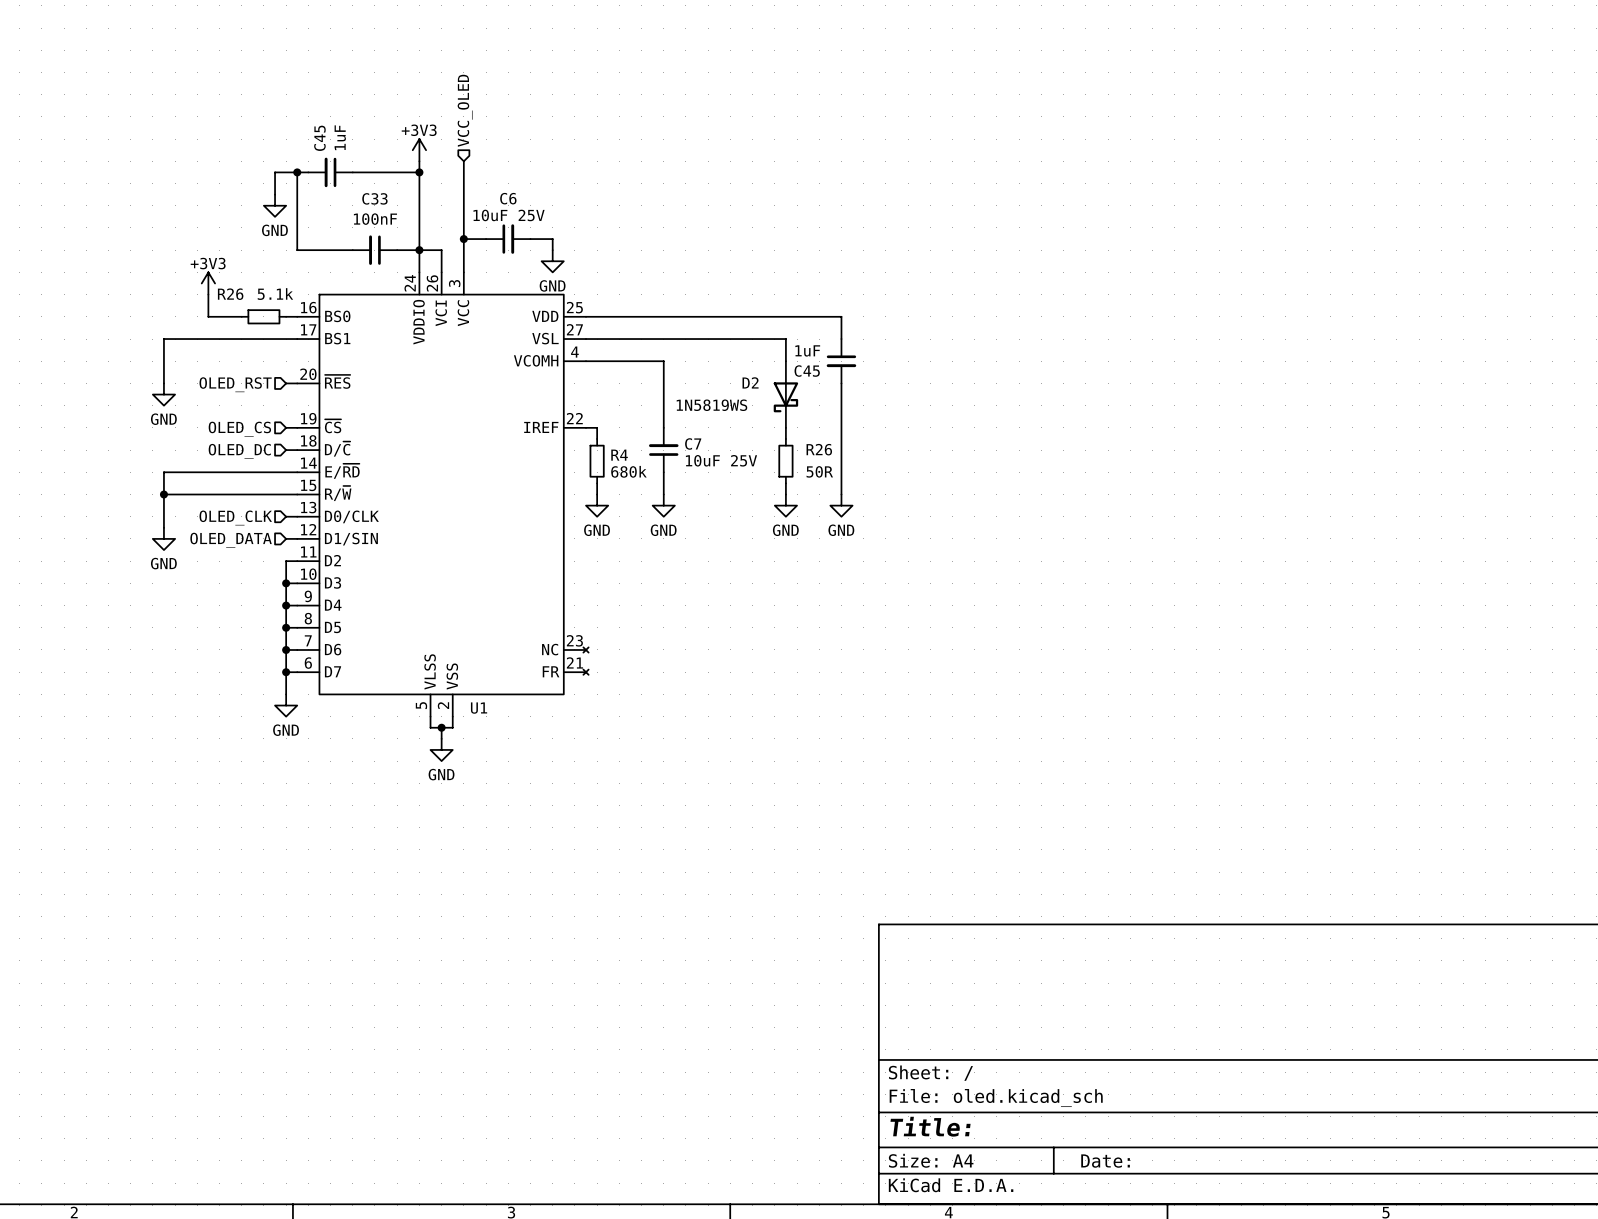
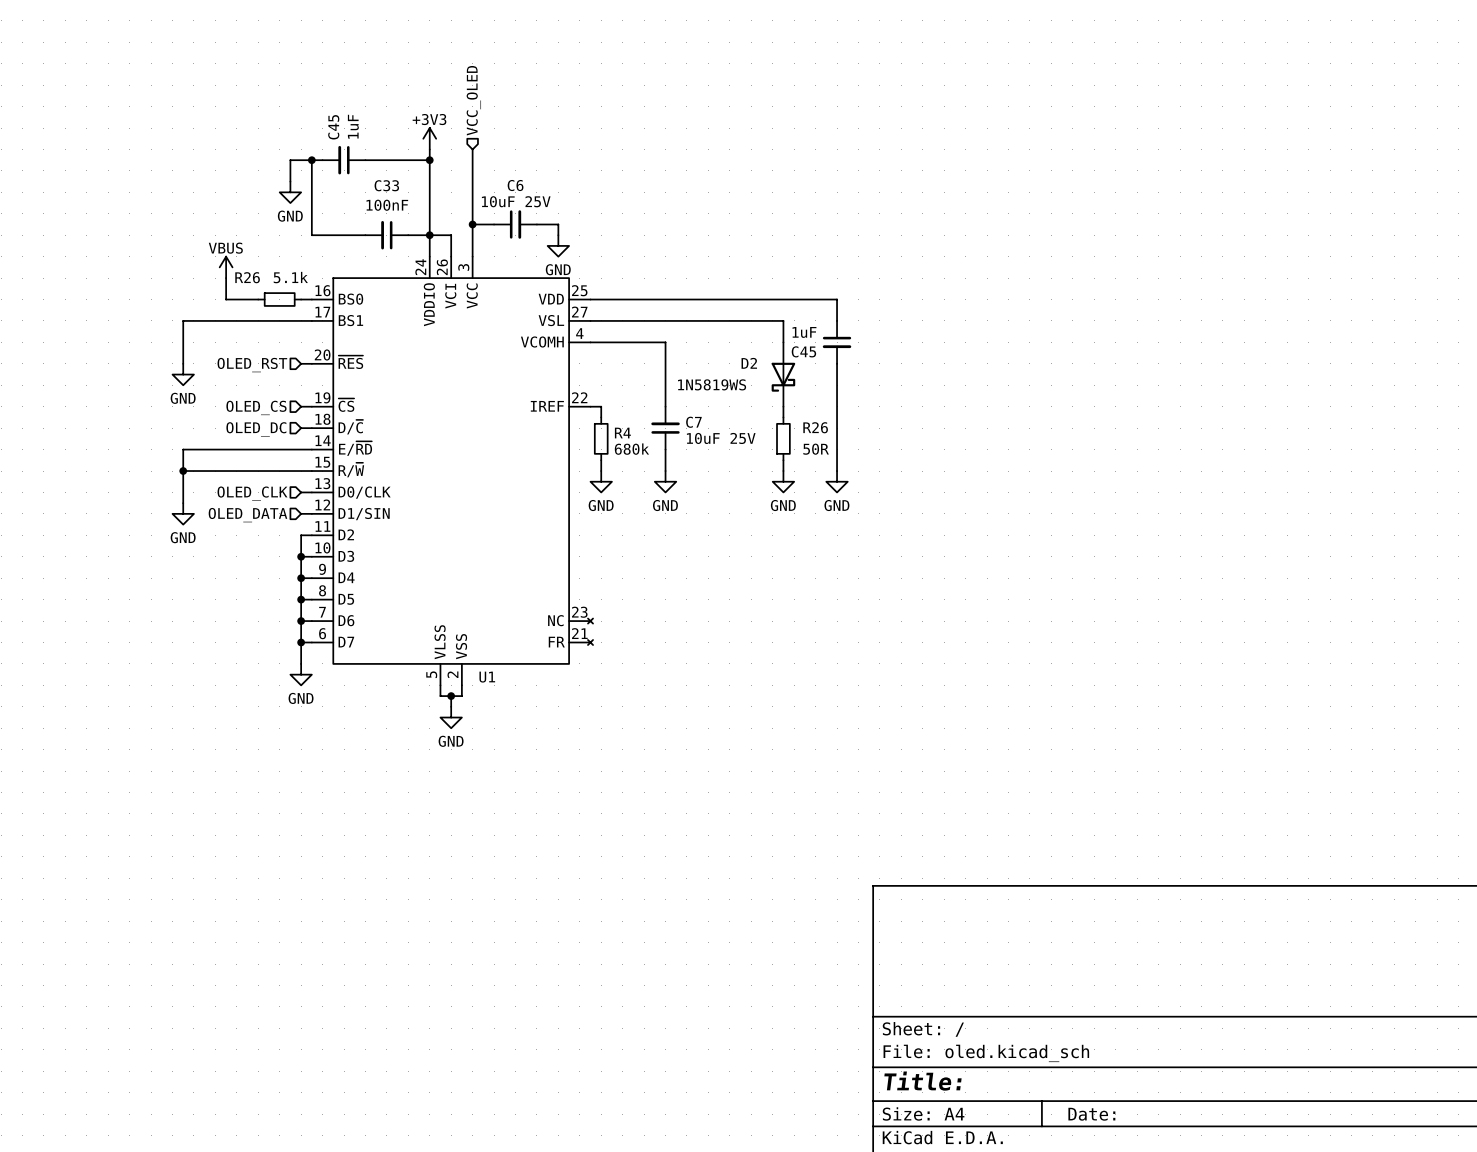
power symbol: +3V3 (208, 283) -> VBUS (226, 267)

